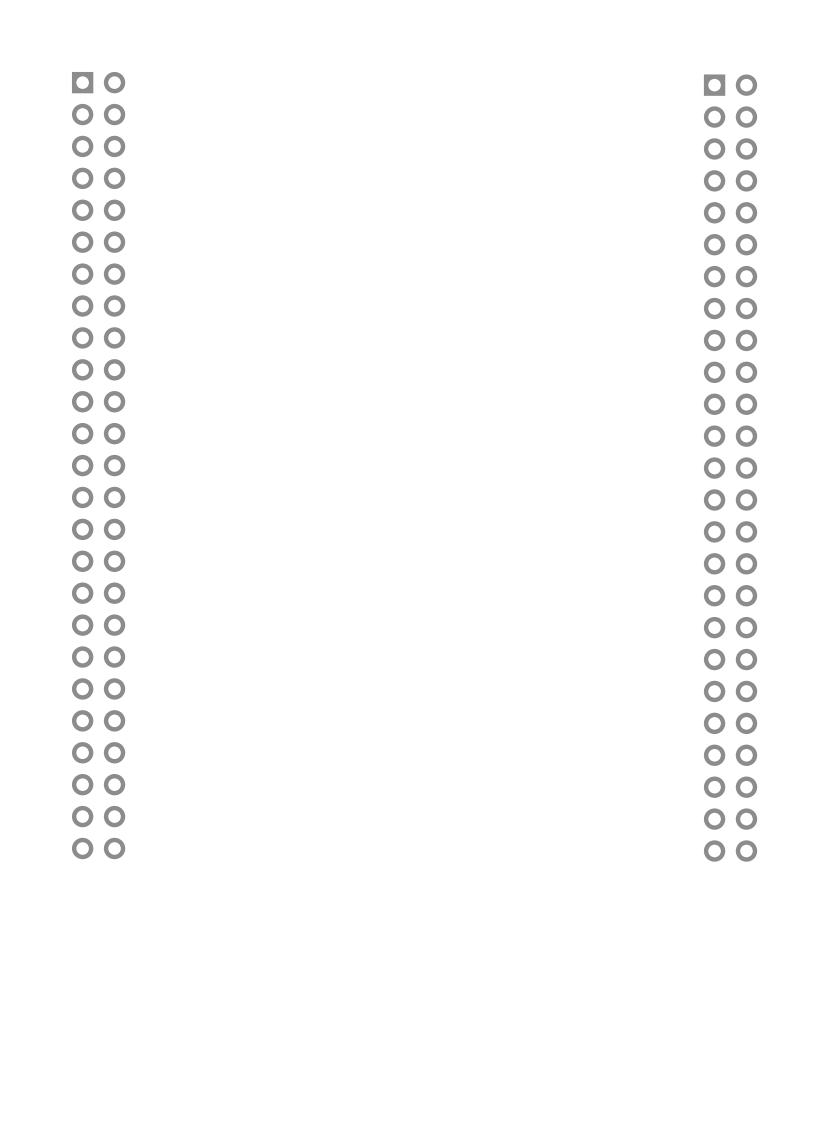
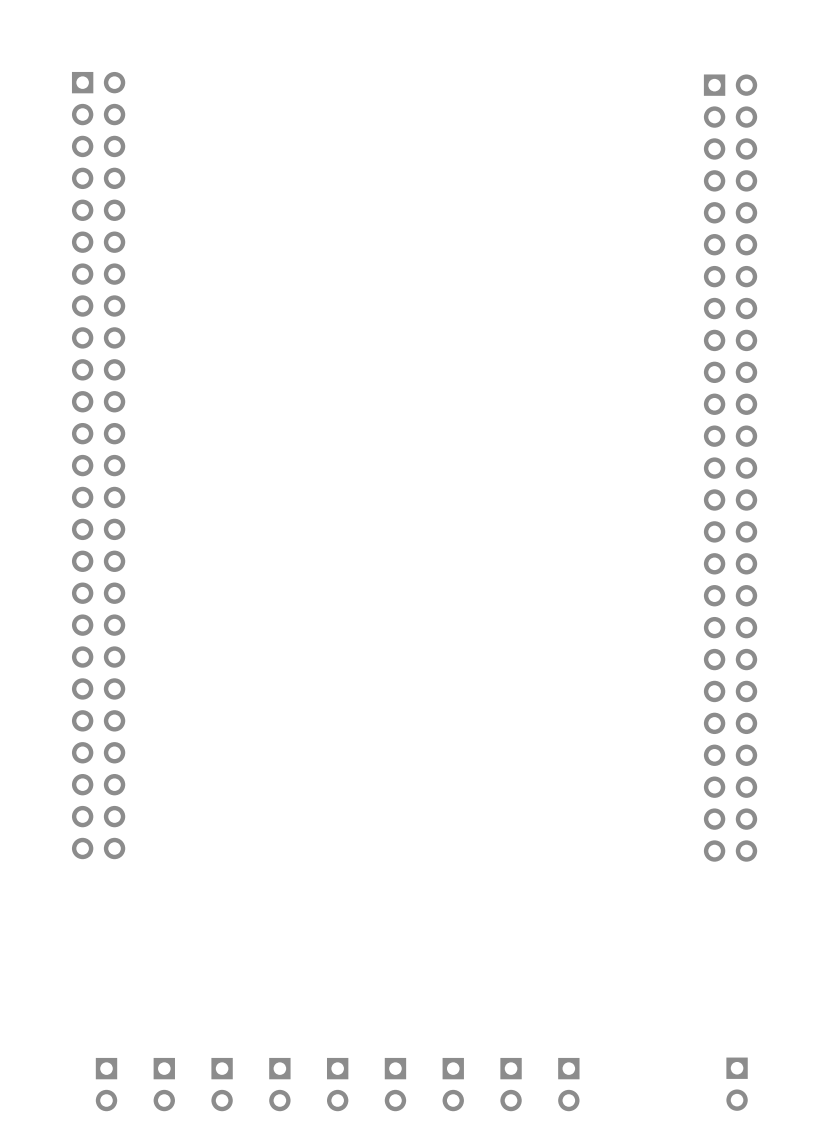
part: none -> (106, 1084)
part: none -> (164, 1084)
part: none -> (222, 1084)
part: none -> (279, 1084)
part: none -> (337, 1084)
part: none -> (395, 1084)
part: none -> (453, 1084)
part: none -> (511, 1084)
part: none -> (568, 1084)
part: none -> (737, 1084)

